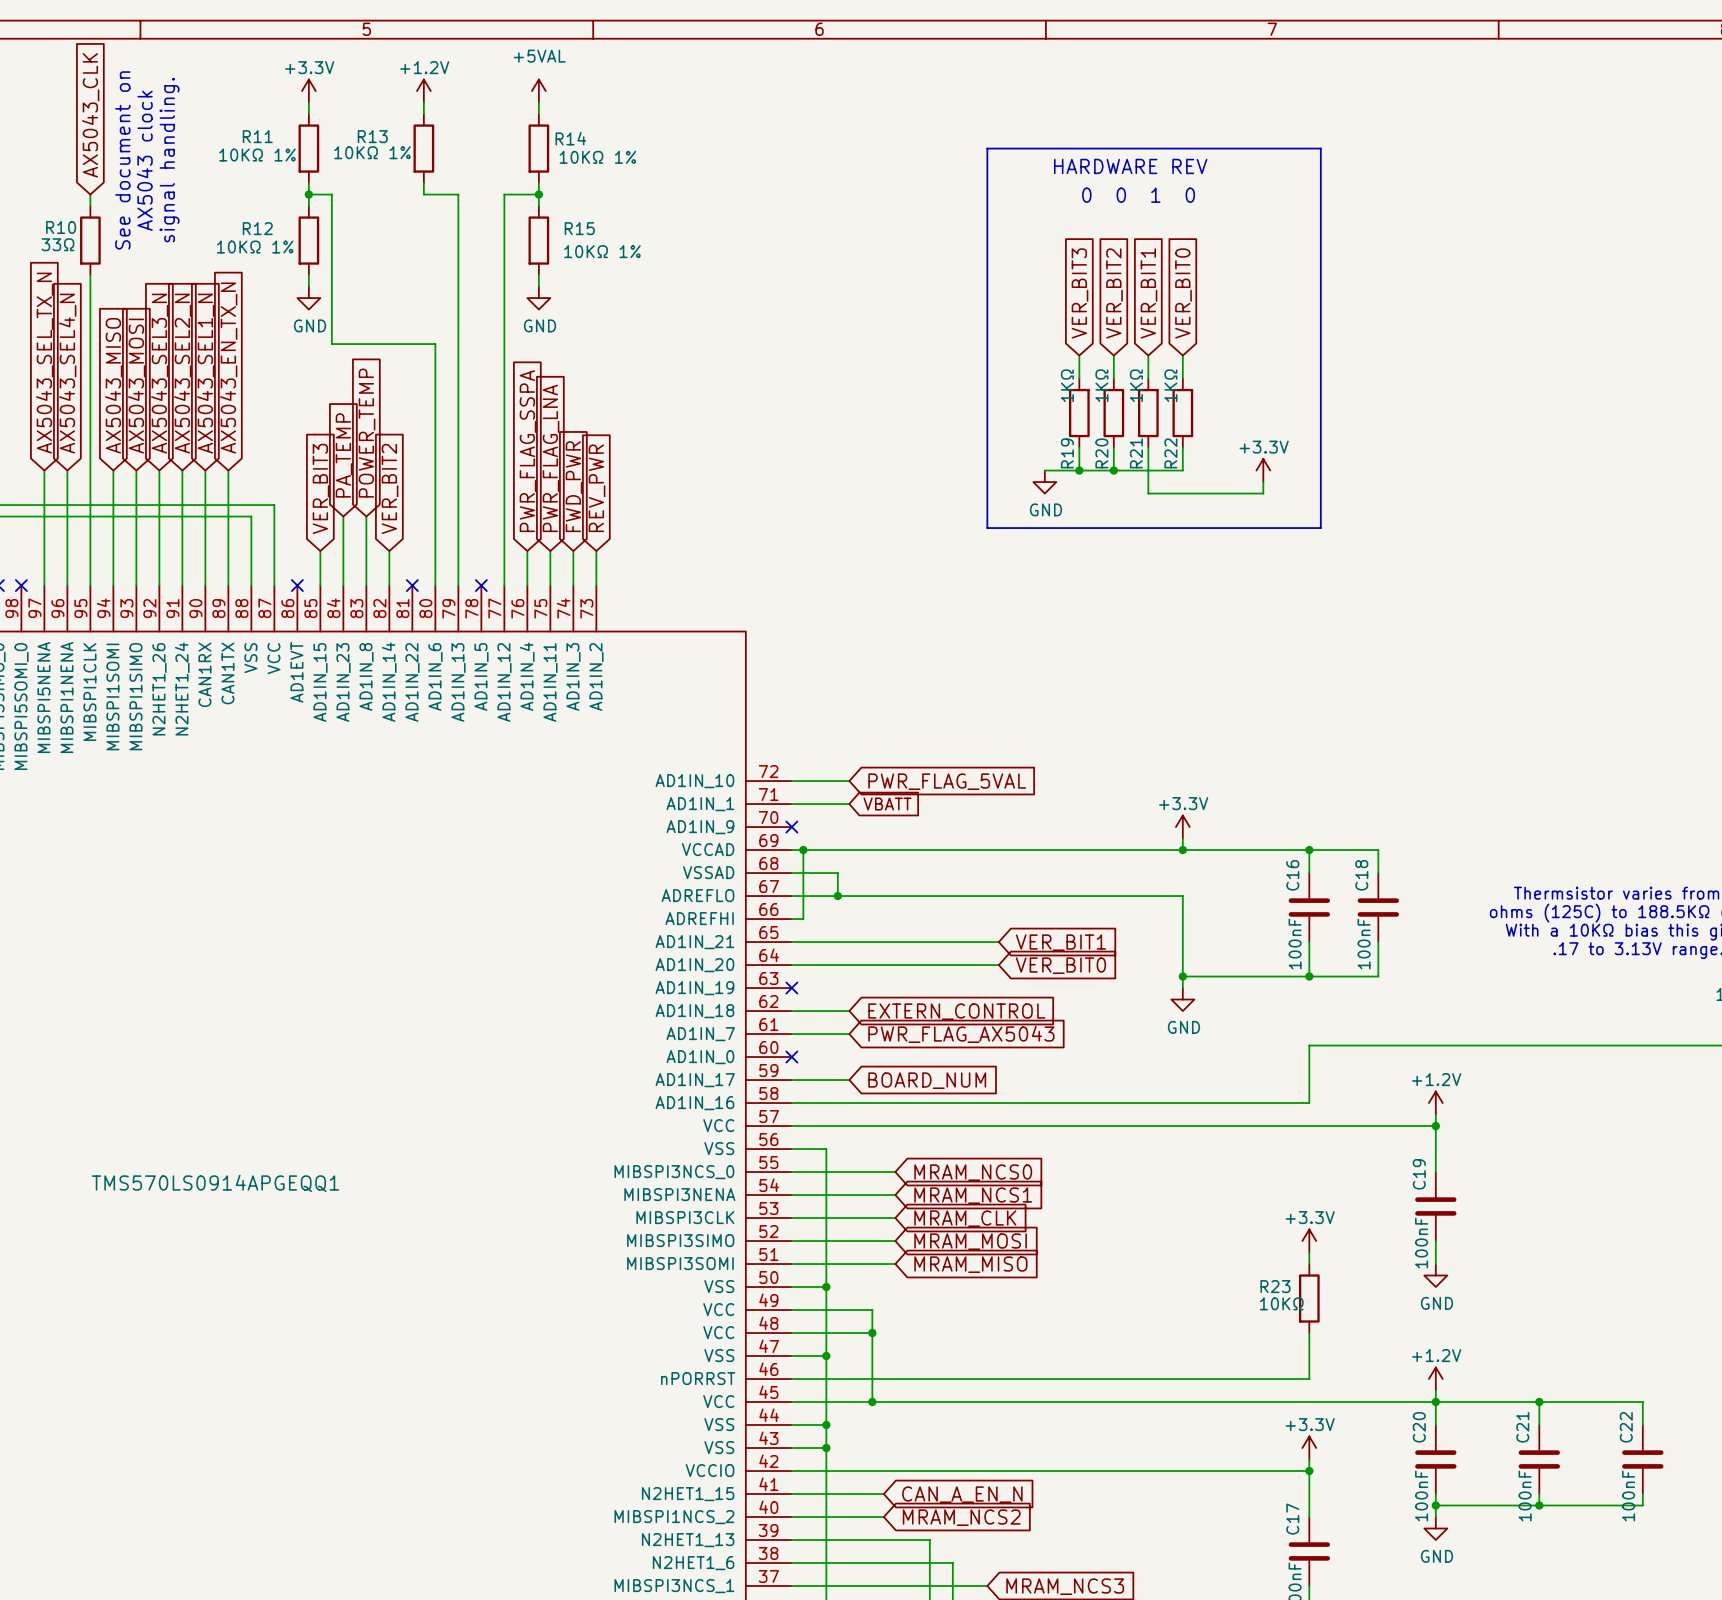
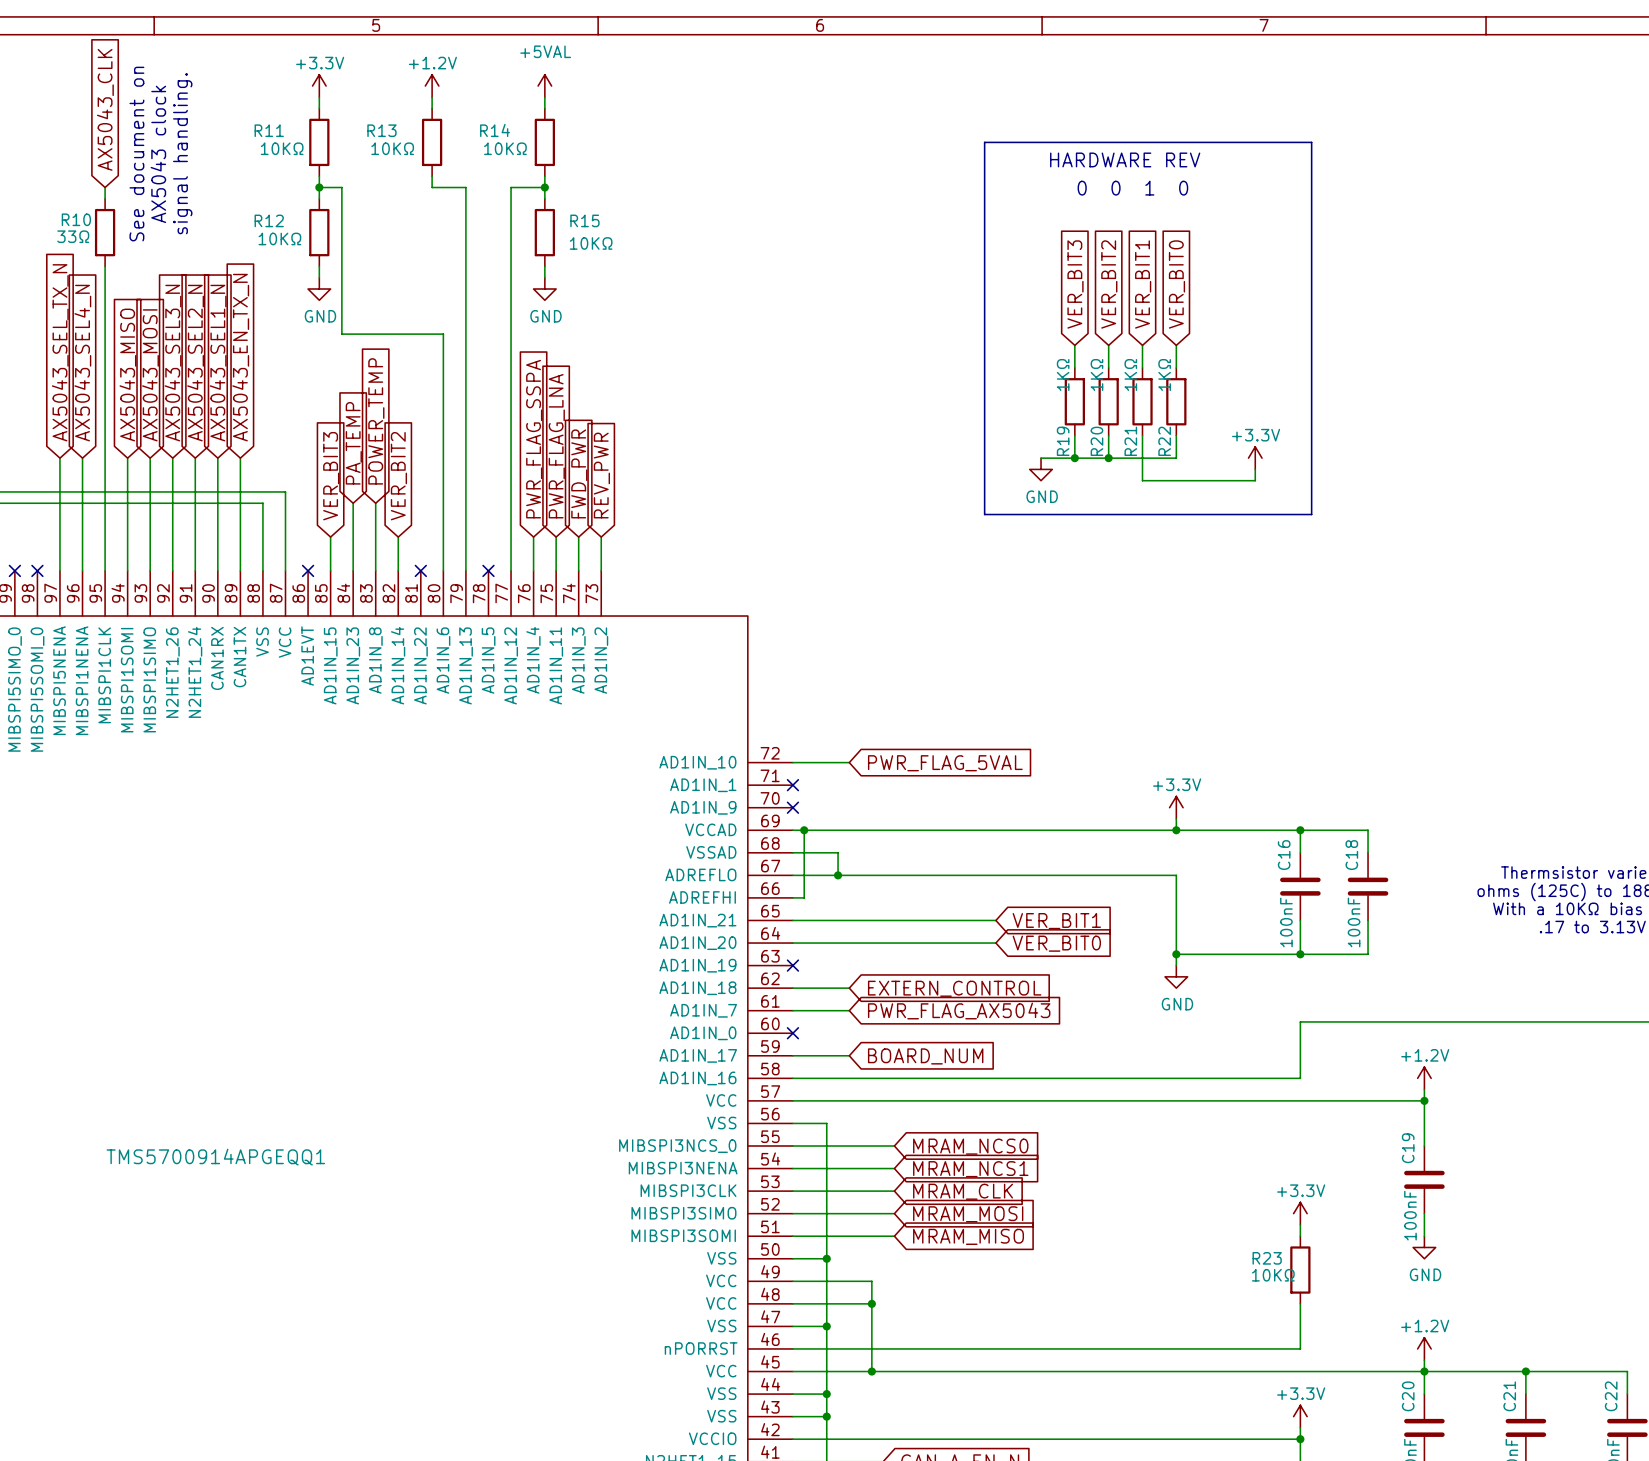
R14 name position: R14 (570, 138) -> R14 (495, 130)
R13 value: 10KΩ 1% (372, 152) -> 10KΩ (392, 148)
R11 value: 10KΩ 1% (257, 155) -> 10KΩ (282, 148)
R14 value: 10KΩ 1% (597, 157) -> 10KΩ (505, 148)
R12 value: 10KΩ 1% (255, 247) -> 10KΩ (279, 238)
R15 value: 10KΩ 1% (602, 251) -> 10KΩ (591, 243)
wire: (791, 804) (849, 804) -> none
no-connect mark: none -> (792, 785)
global label: VBATT (887, 804) -> none
part value: TMS570LS0914APGEQQ1 (215, 1183) -> TMS5700914APGEQQ1 (215, 1157)

